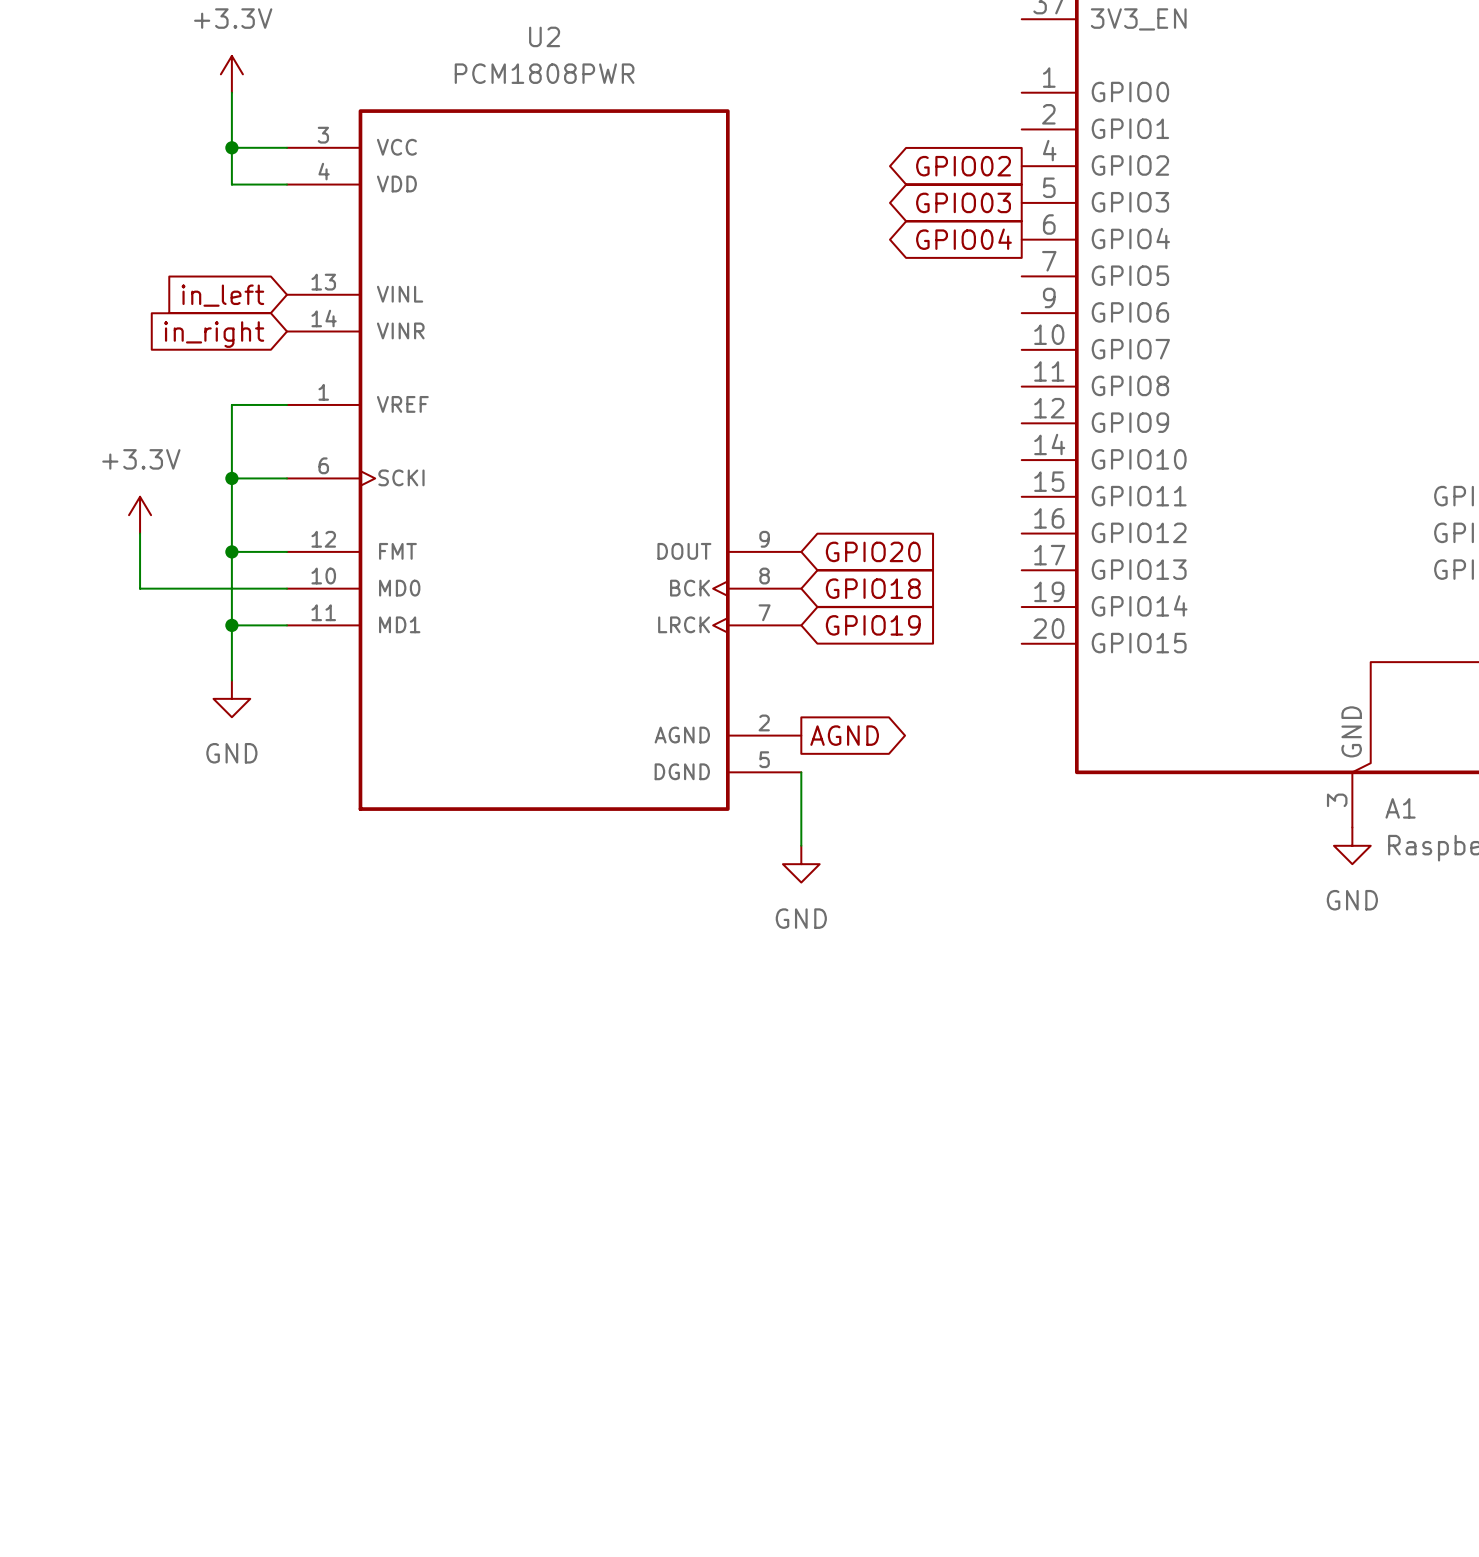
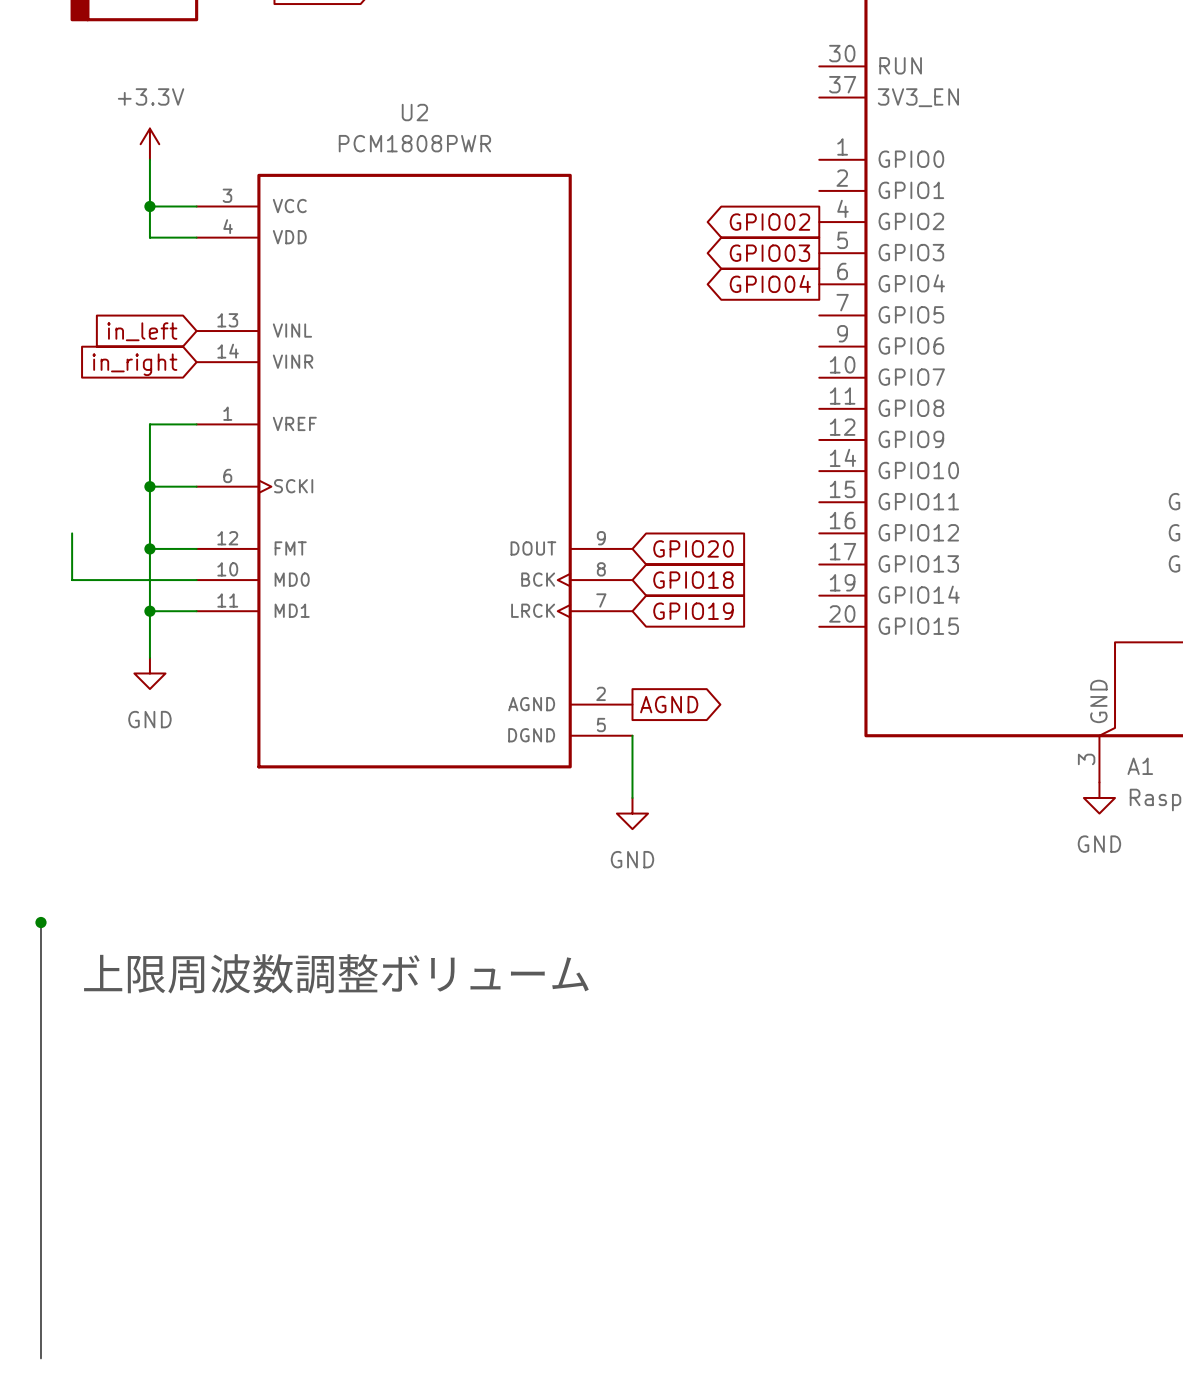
power symbol: +3.3V (140, 515) -> none
bus: none -> (40, 922) (40, 1358)
junction: none -> (40, 922)
text: none -> 上限周波数調整ボリューム (336, 973)

